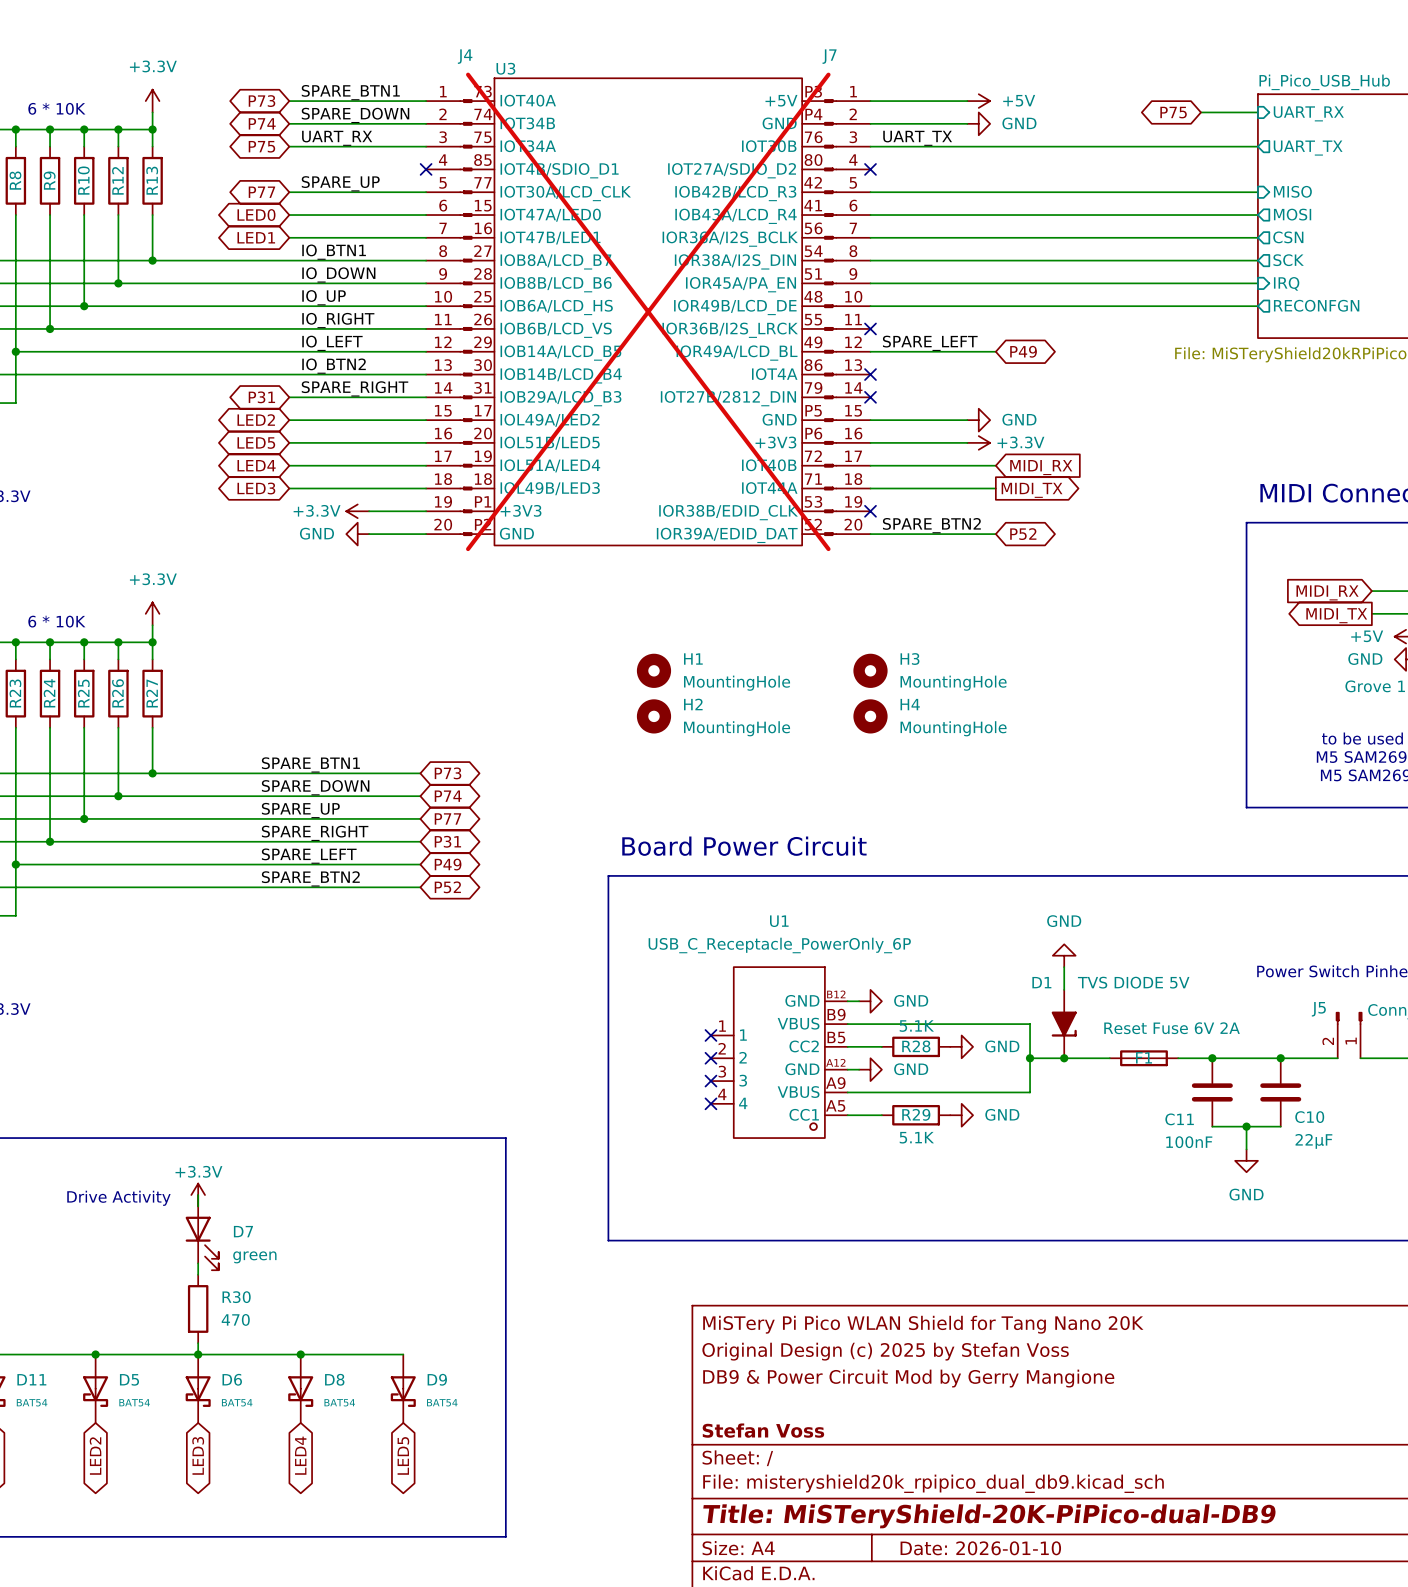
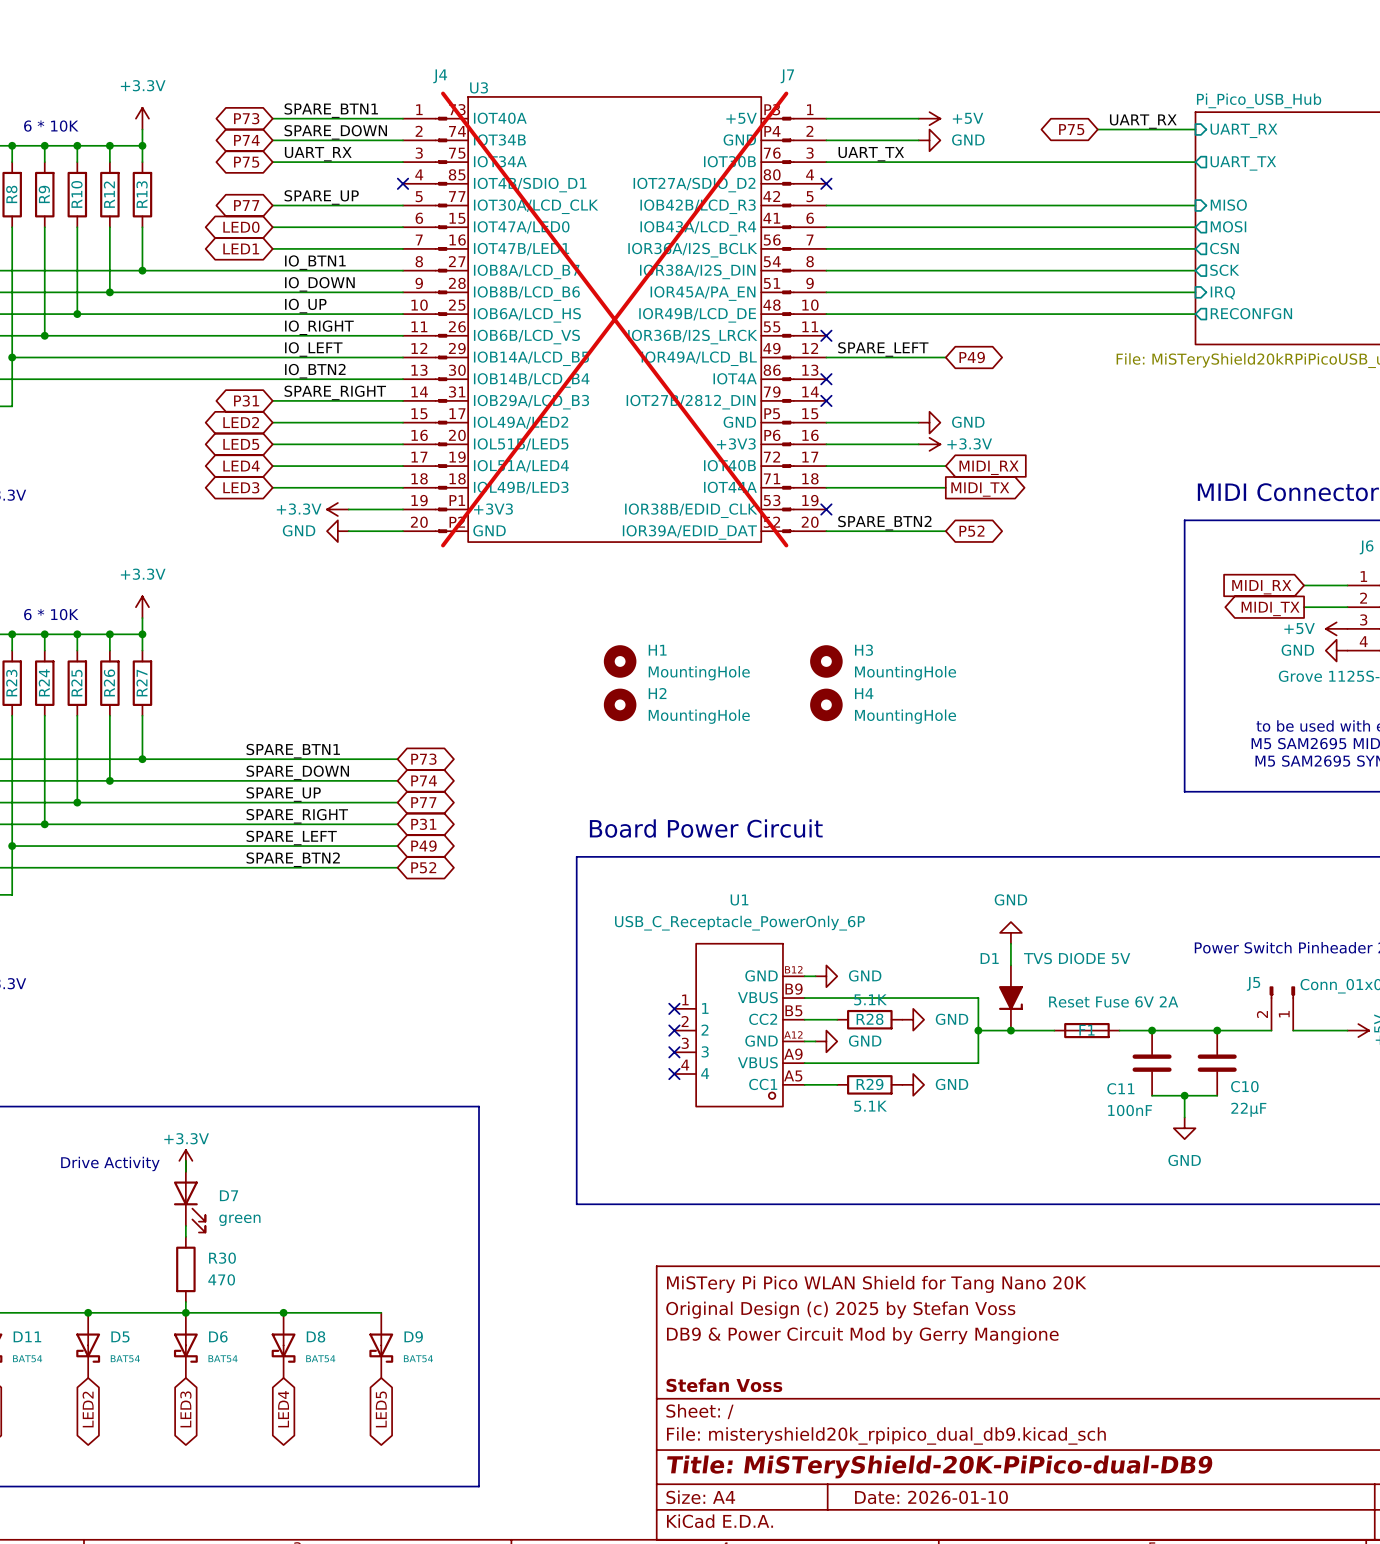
label: none -> UART_RX (1143, 121)
wire: none -> (1097, 129) (1141, 129)
global label position: P75 (1173, 112) -> P75 (1071, 129)

